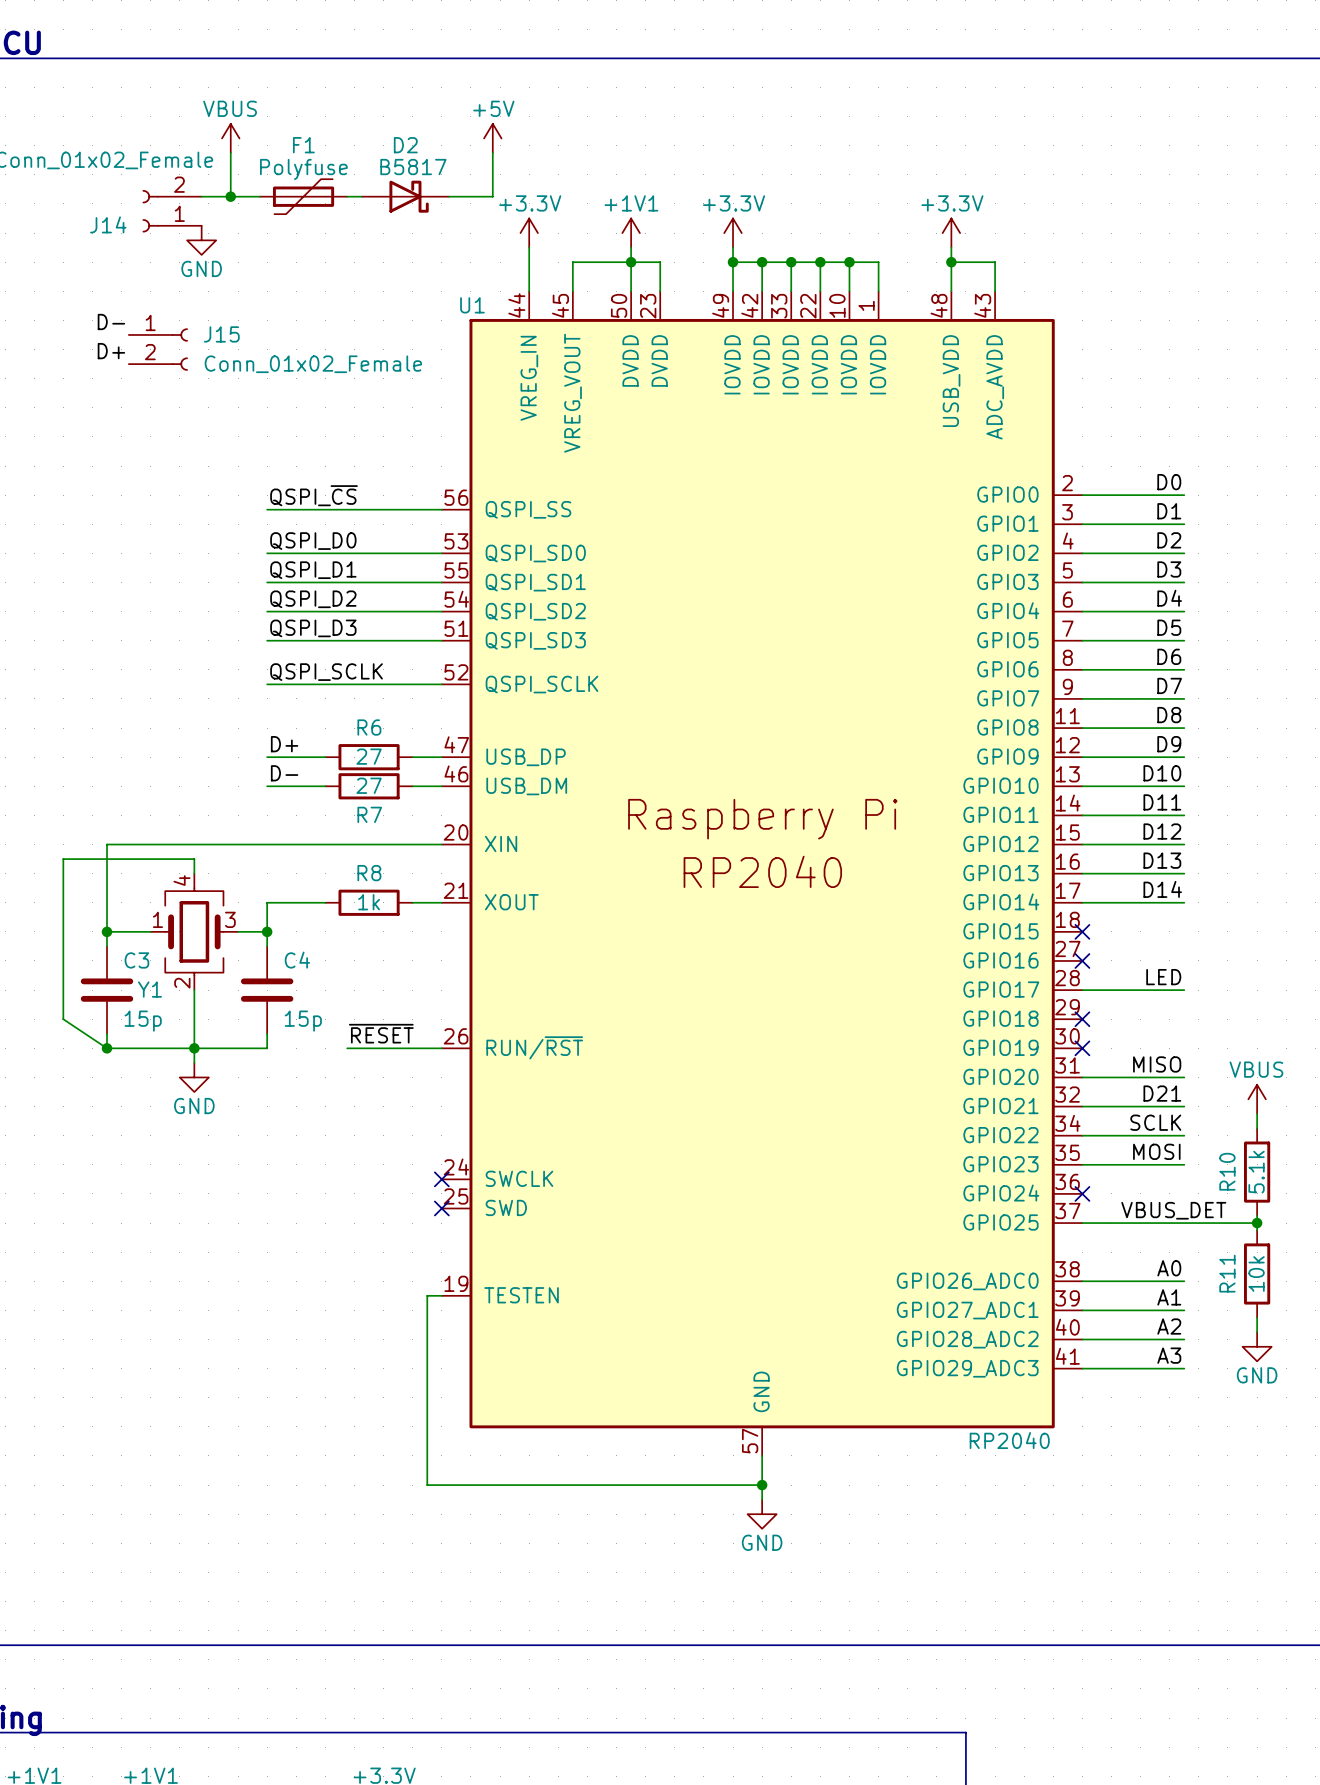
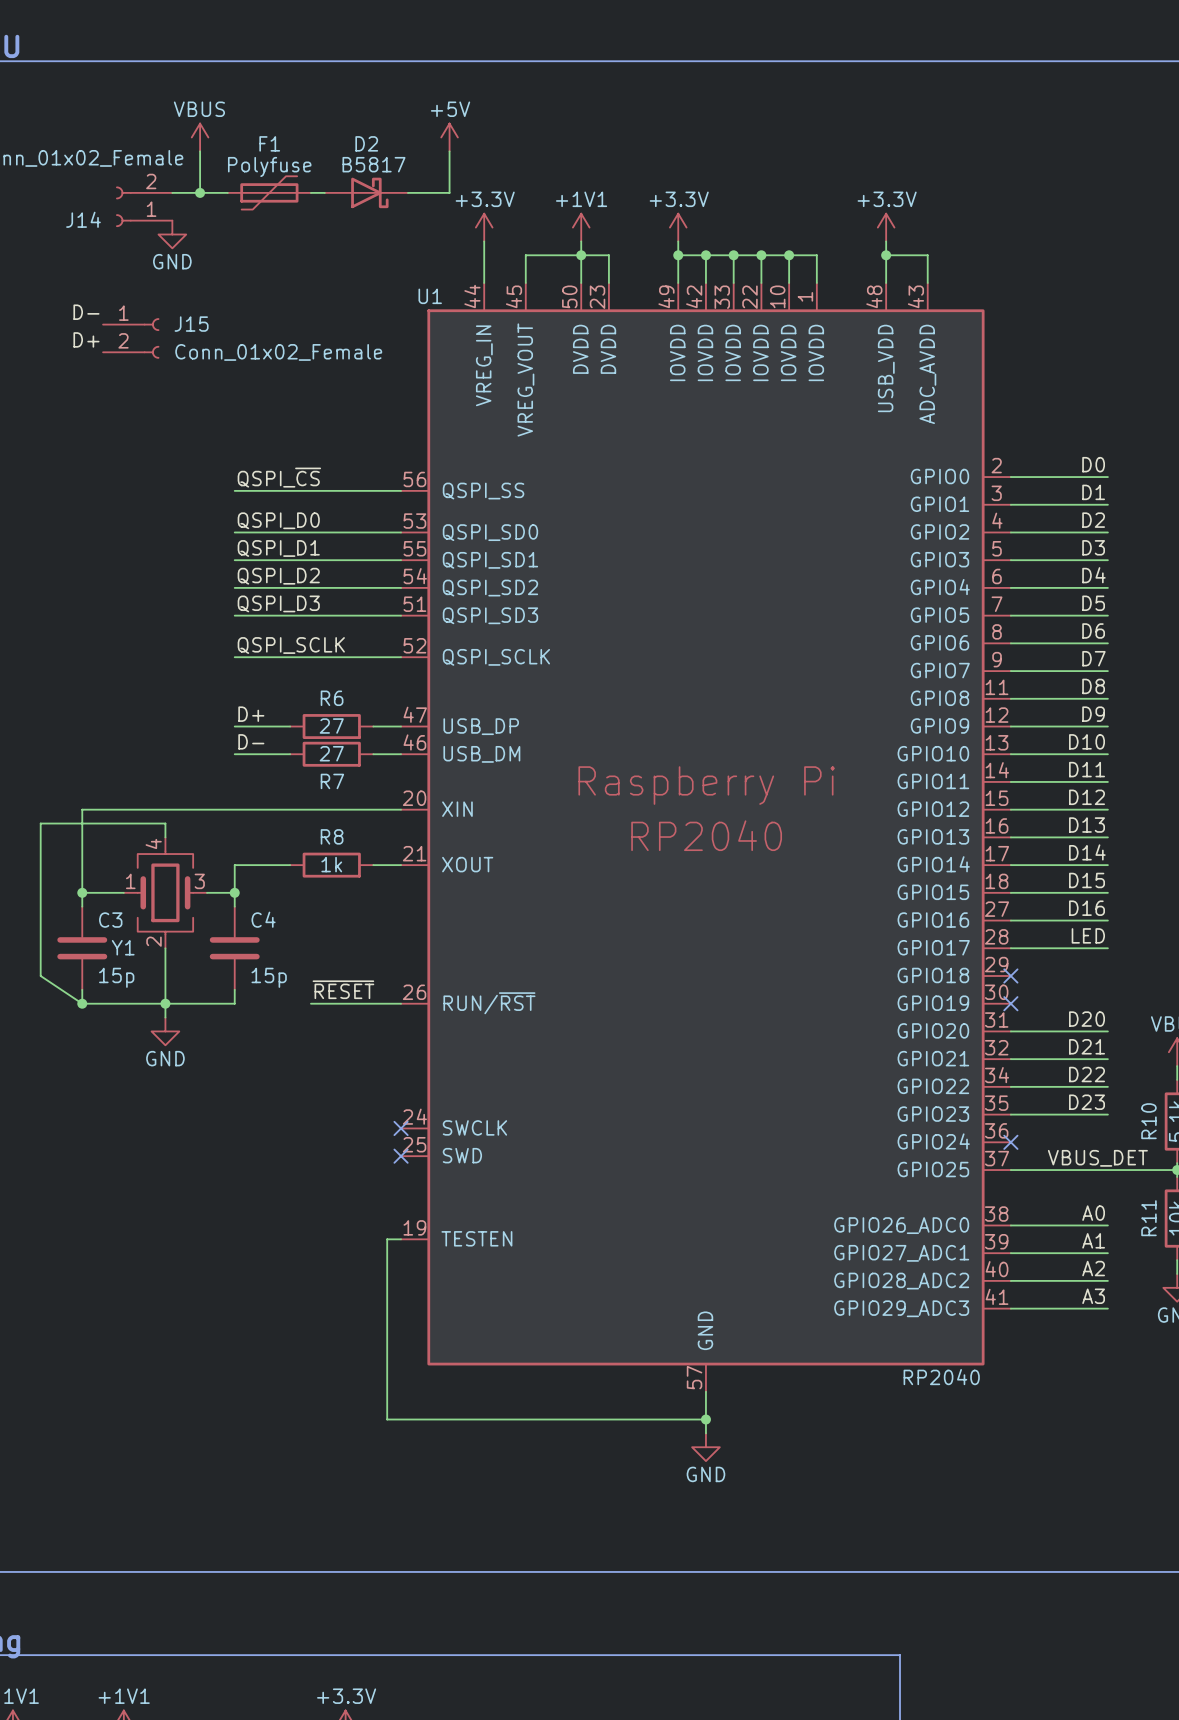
label: none -> D15 (1087, 880)
wire: none -> (1010, 892) (1107, 892)
no-connect mark: (1082, 931) -> none
label: none -> D16 (1087, 908)
wire: none -> (1010, 920) (1107, 920)
no-connect mark: (1082, 960) -> none
label: MISO (1157, 1064) -> D20 (1087, 1019)
label: SCLK (1155, 1122) -> D22 (1087, 1074)
label: MOSI (1156, 1151) -> D23 (1087, 1102)

